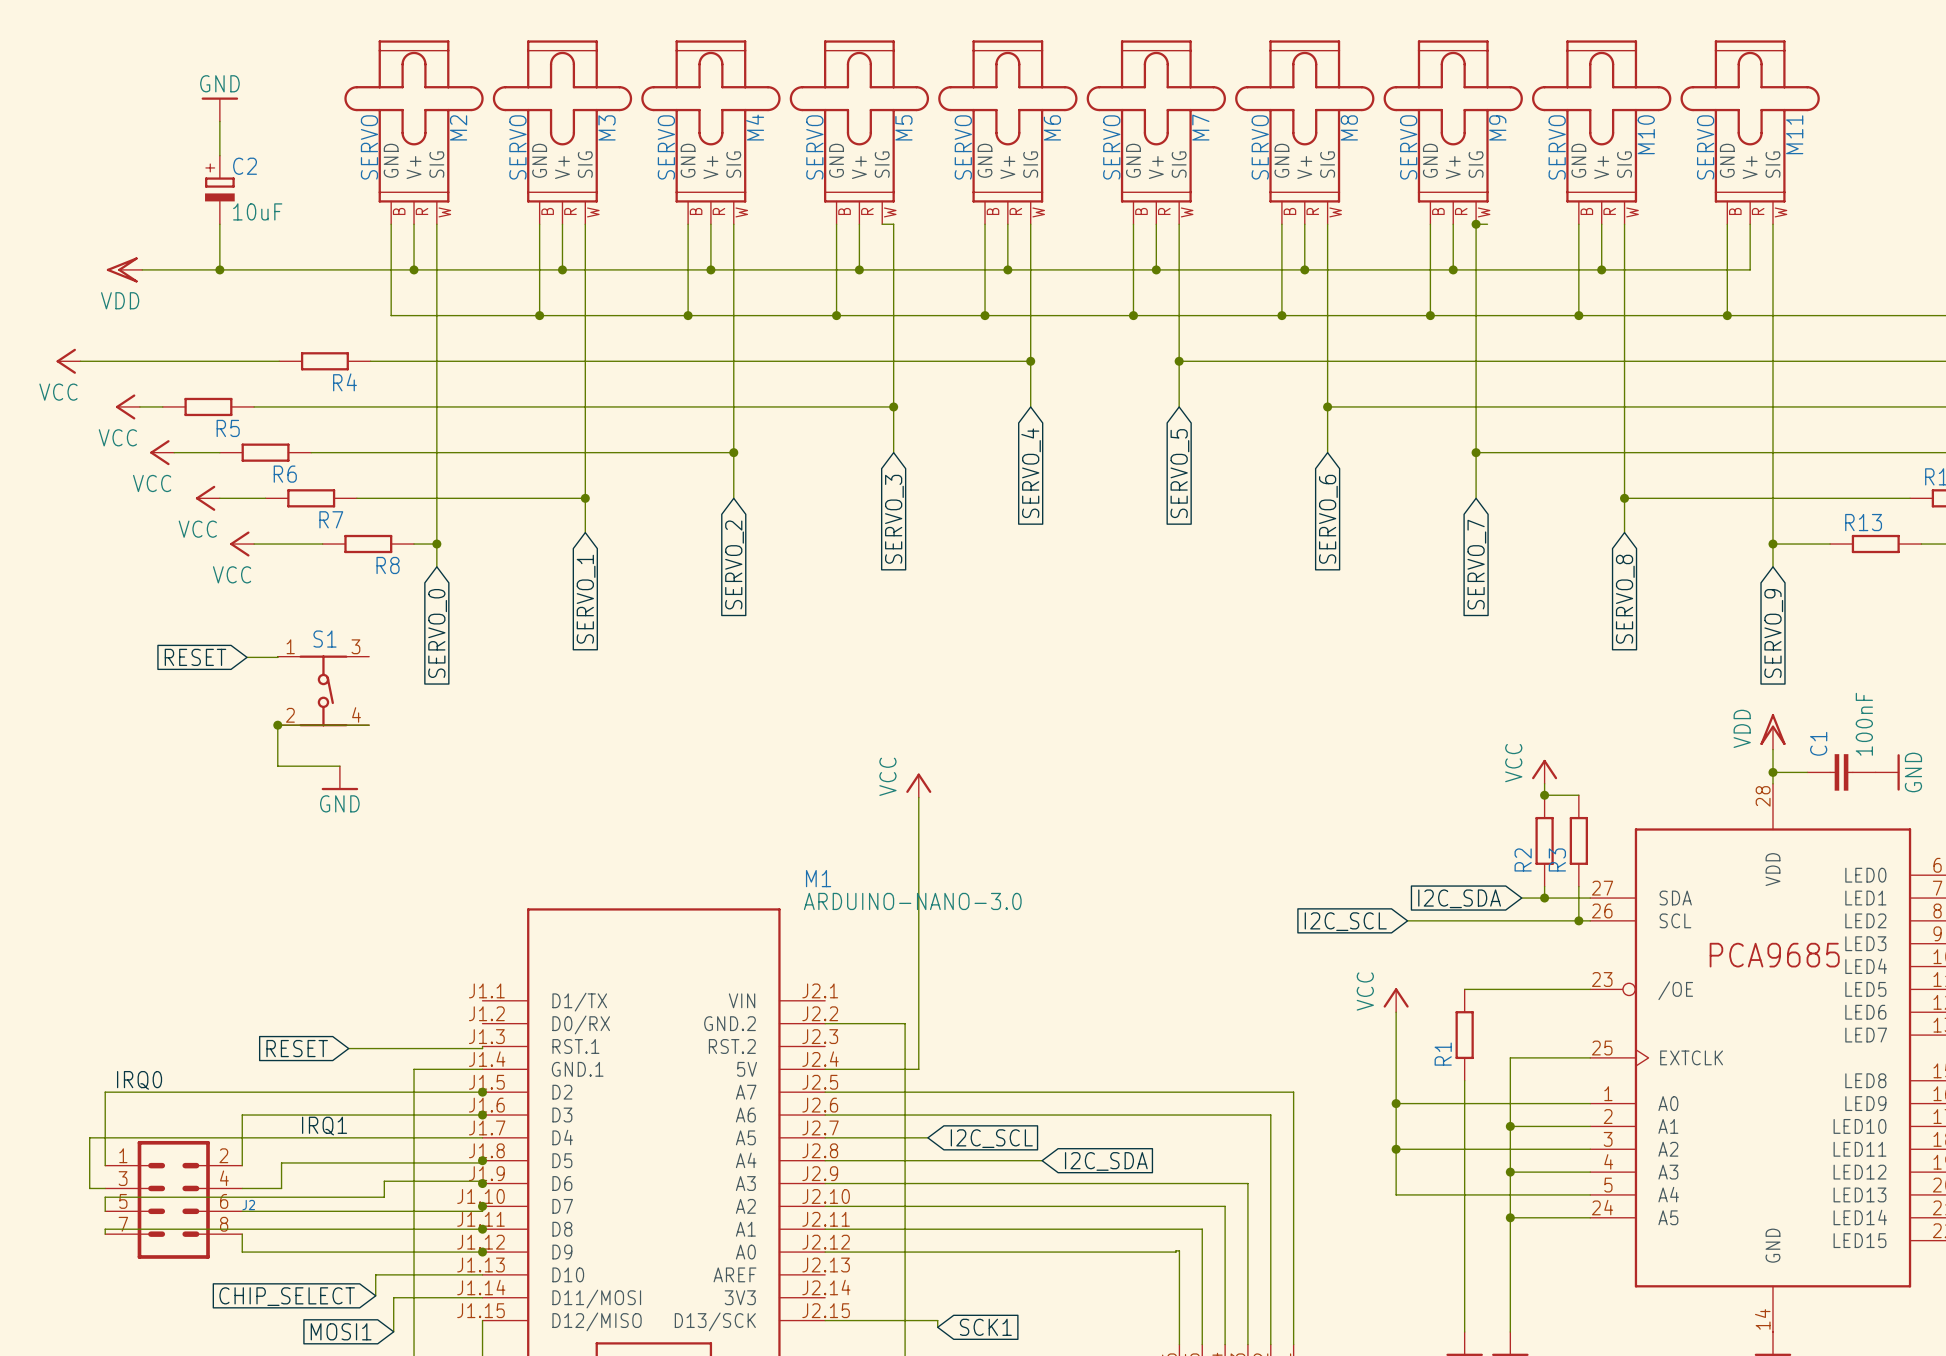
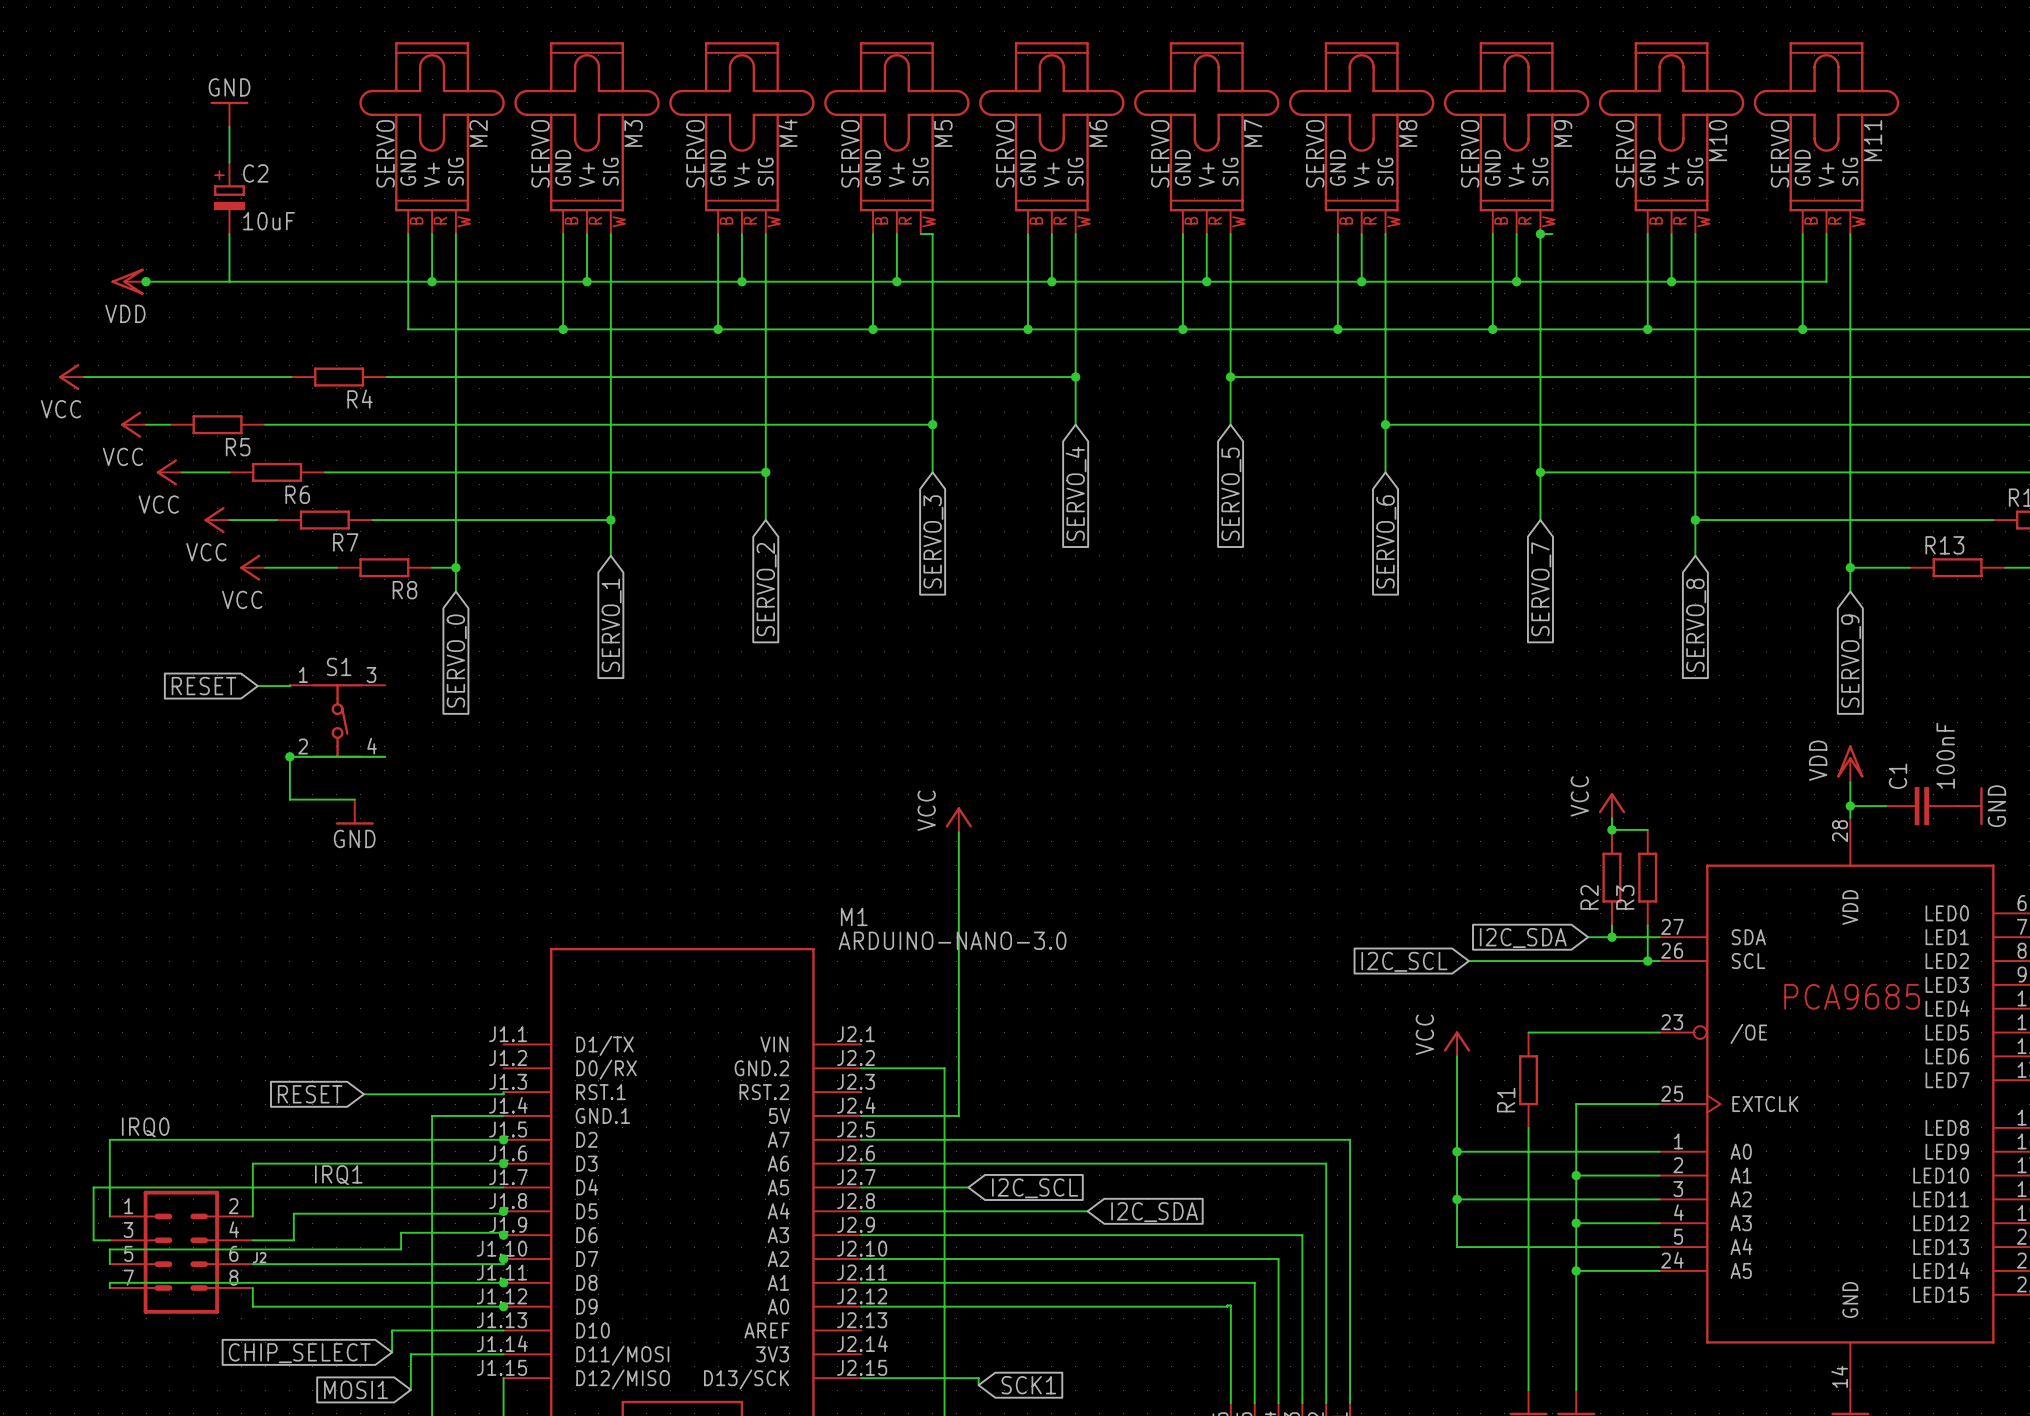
junction: none -> (146, 281)
junction: (219, 269) -> none

